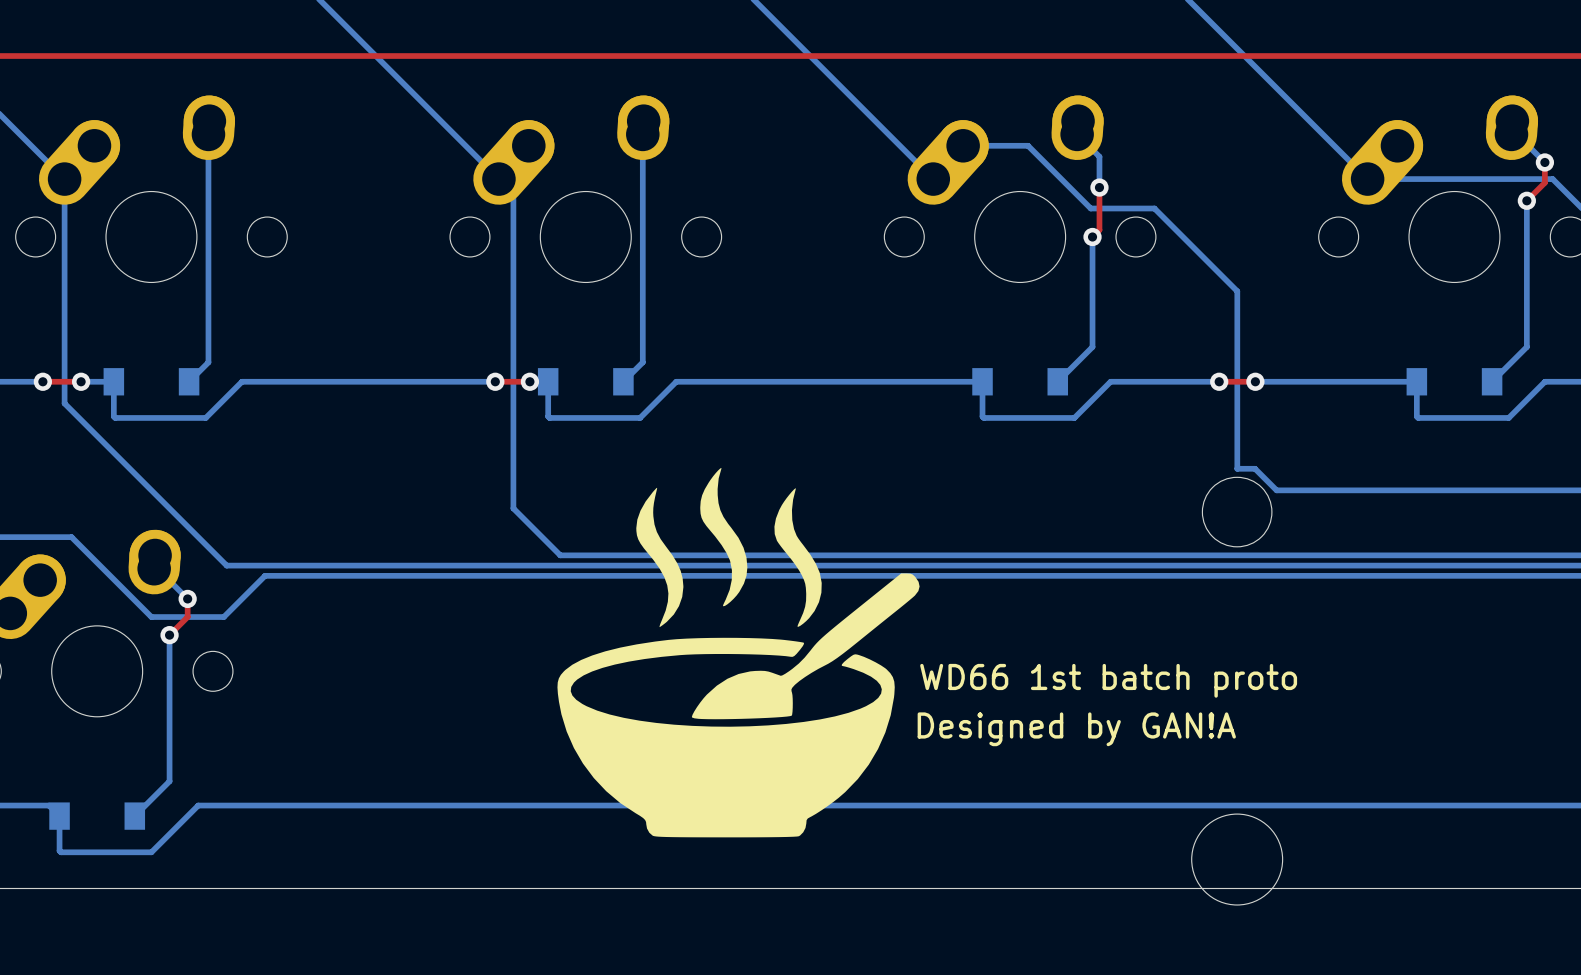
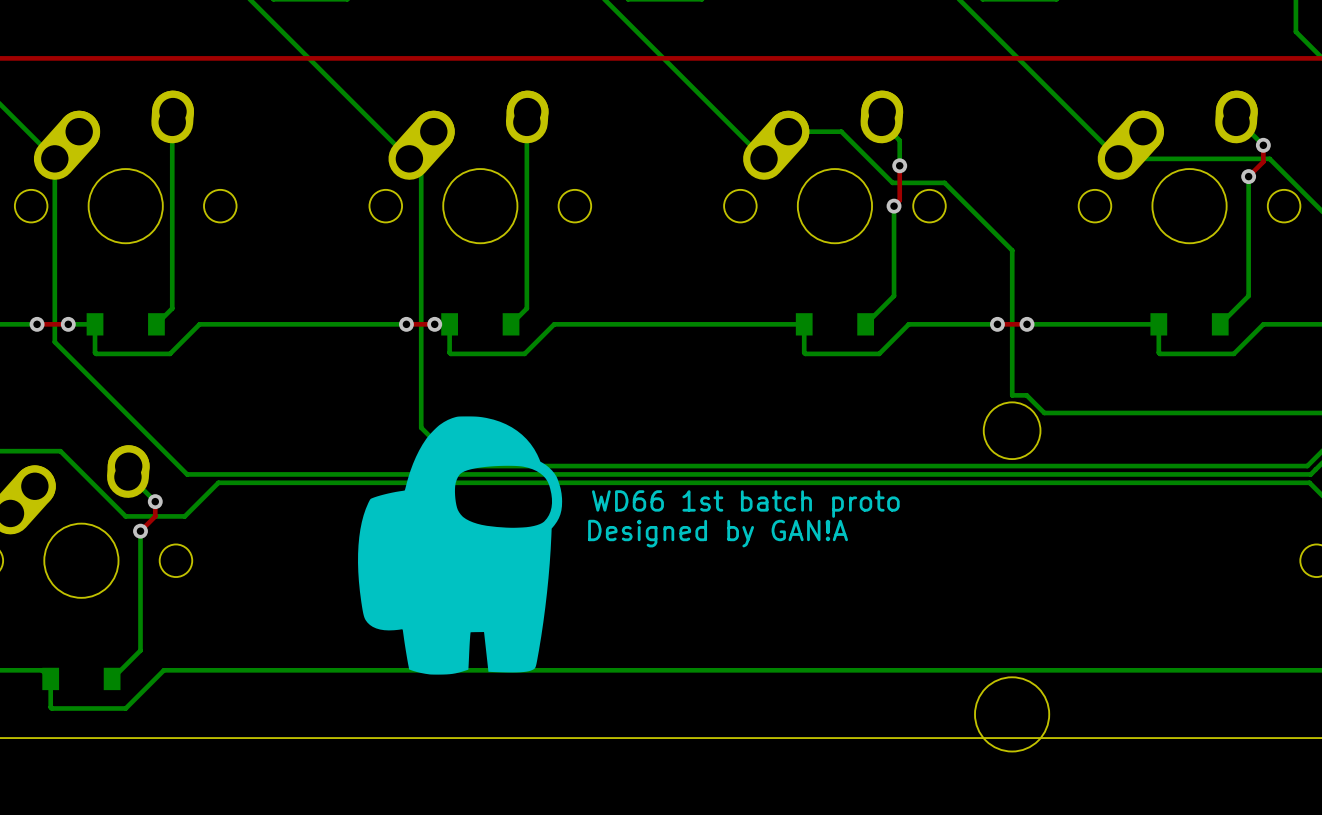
drawing: [557, 467, 920, 838] -> none
part: none -> (460, 545)
text position: WD66 1st batch proto (1108, 680) -> WD66 1st batch proto (745, 504)
text position: Designed by GAN!A (1076, 729) -> Designed by GAN!A (718, 533)

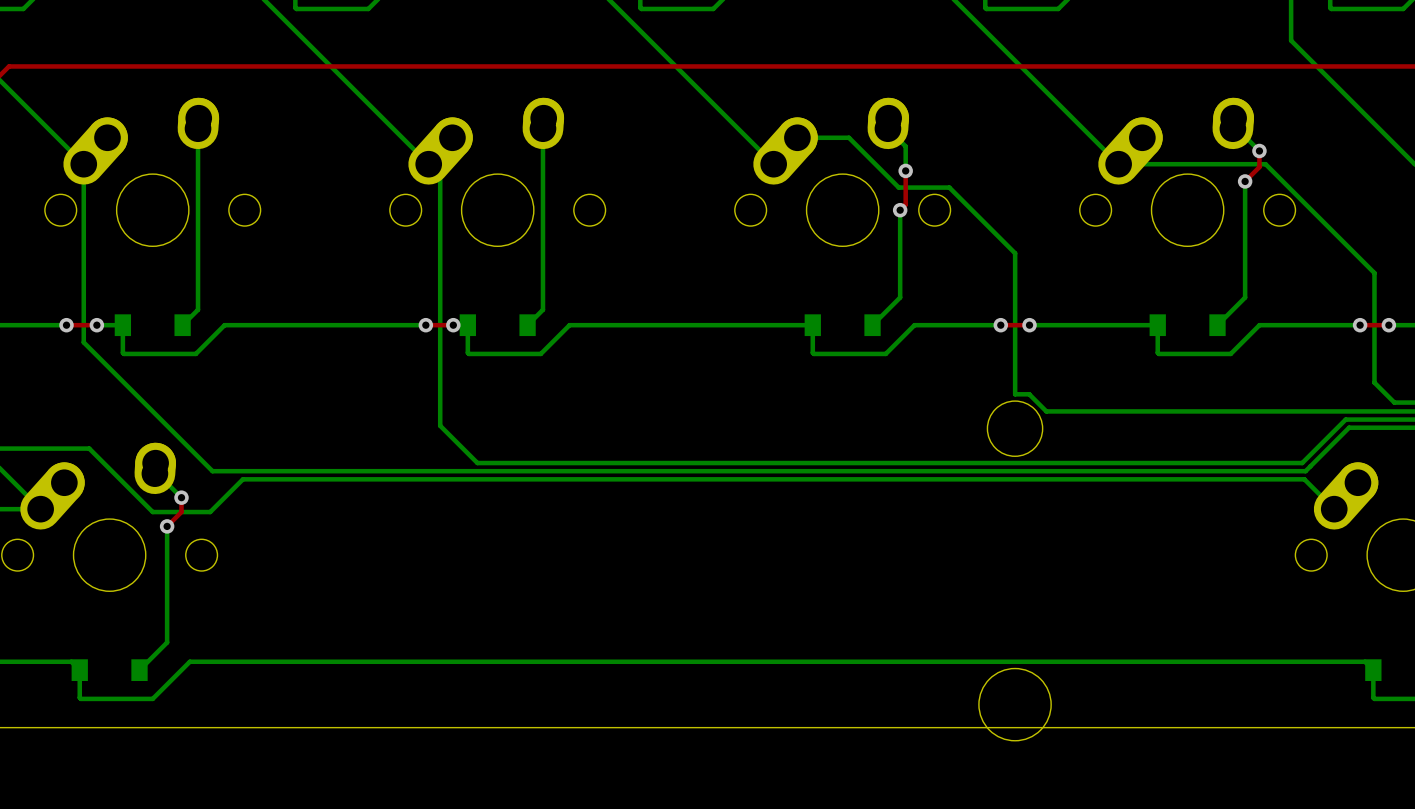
text: WD66 1st batch proto (745, 504) -> none
text: Designed by GAN!A (718, 533) -> none
part: (460, 545) -> none

